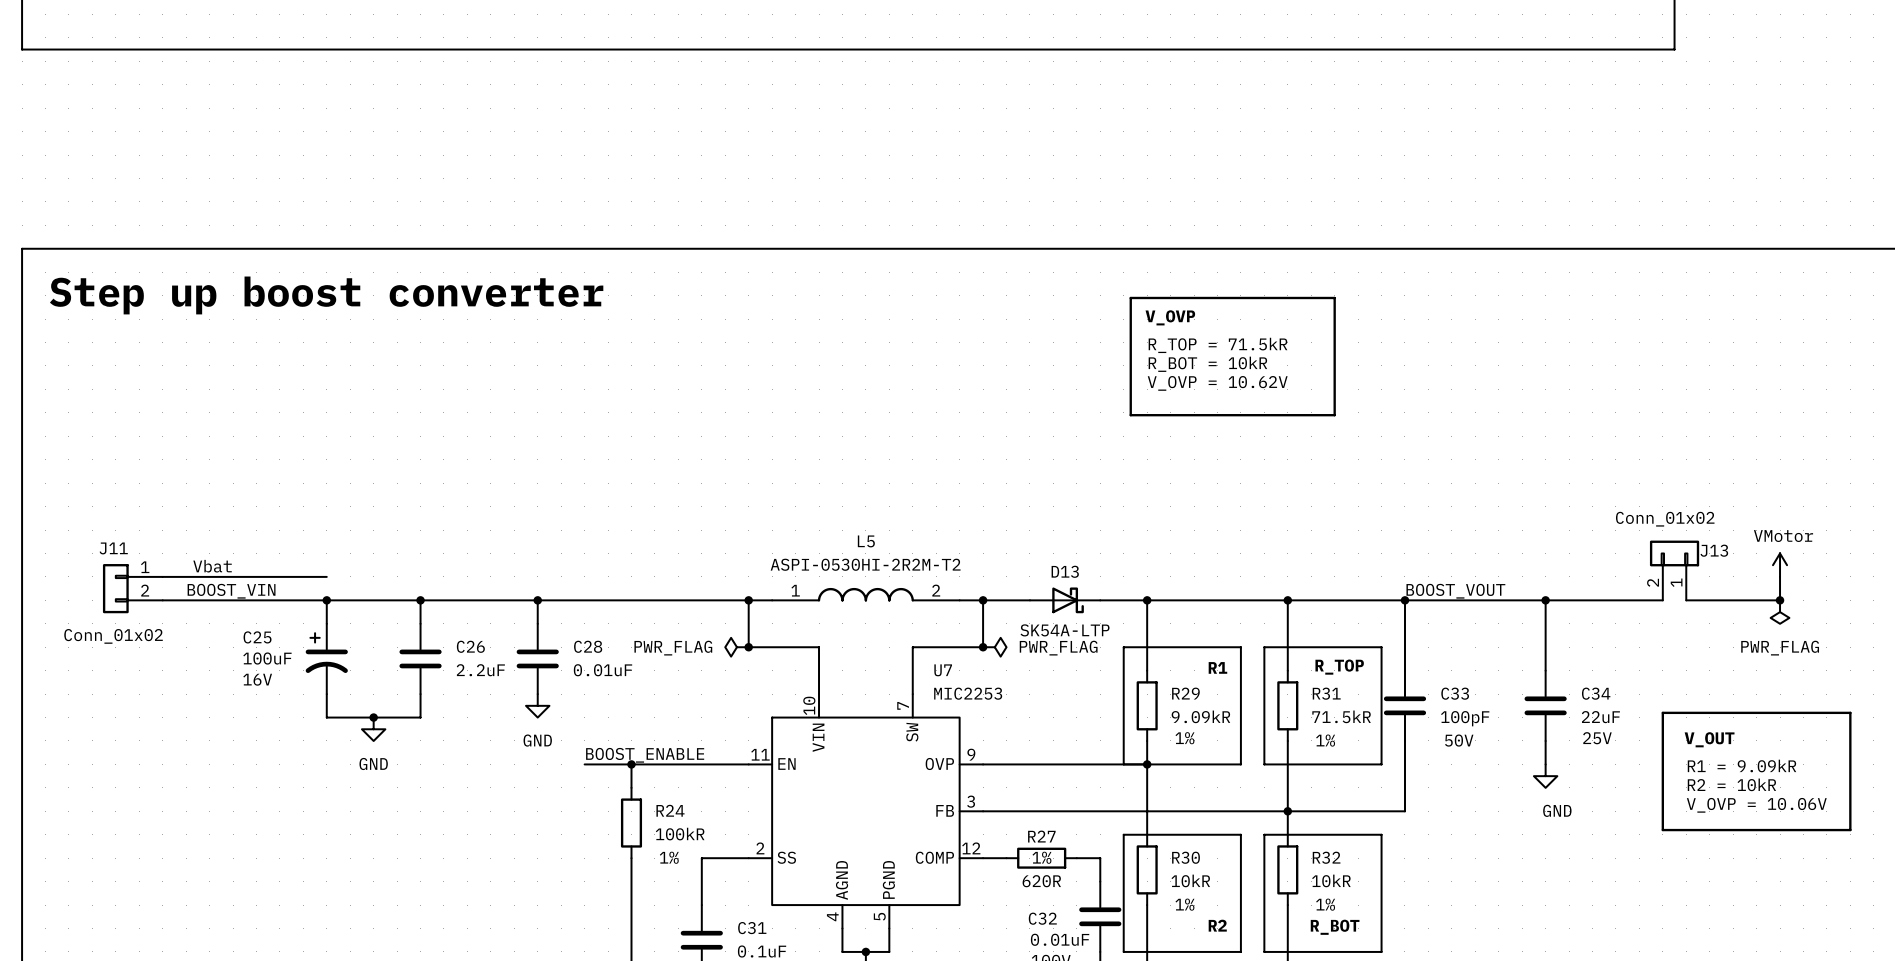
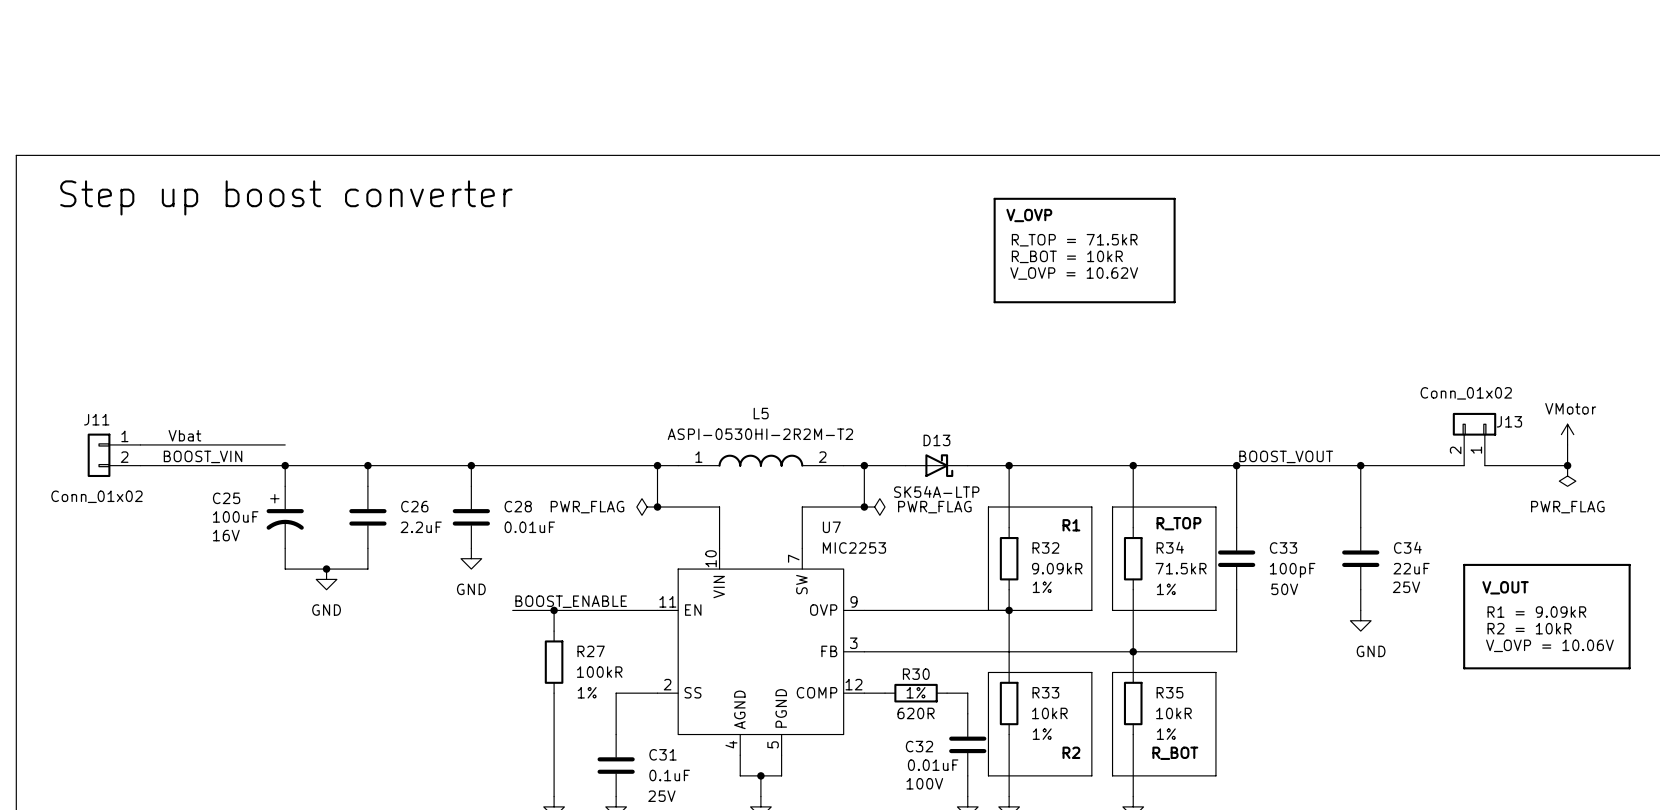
R29 name: R29 (1185, 693) -> R32 (1045, 547)
R31 name: R31 (1326, 693) -> R34 (1170, 547)
R24 name: R24 (670, 810) -> R27 (591, 651)
R27 name: R27 (1041, 836) -> R30 (916, 674)
R30 name: R30 (1186, 857) -> R33 (1045, 692)
R32 name: R32 (1326, 857) -> R35 (1169, 692)

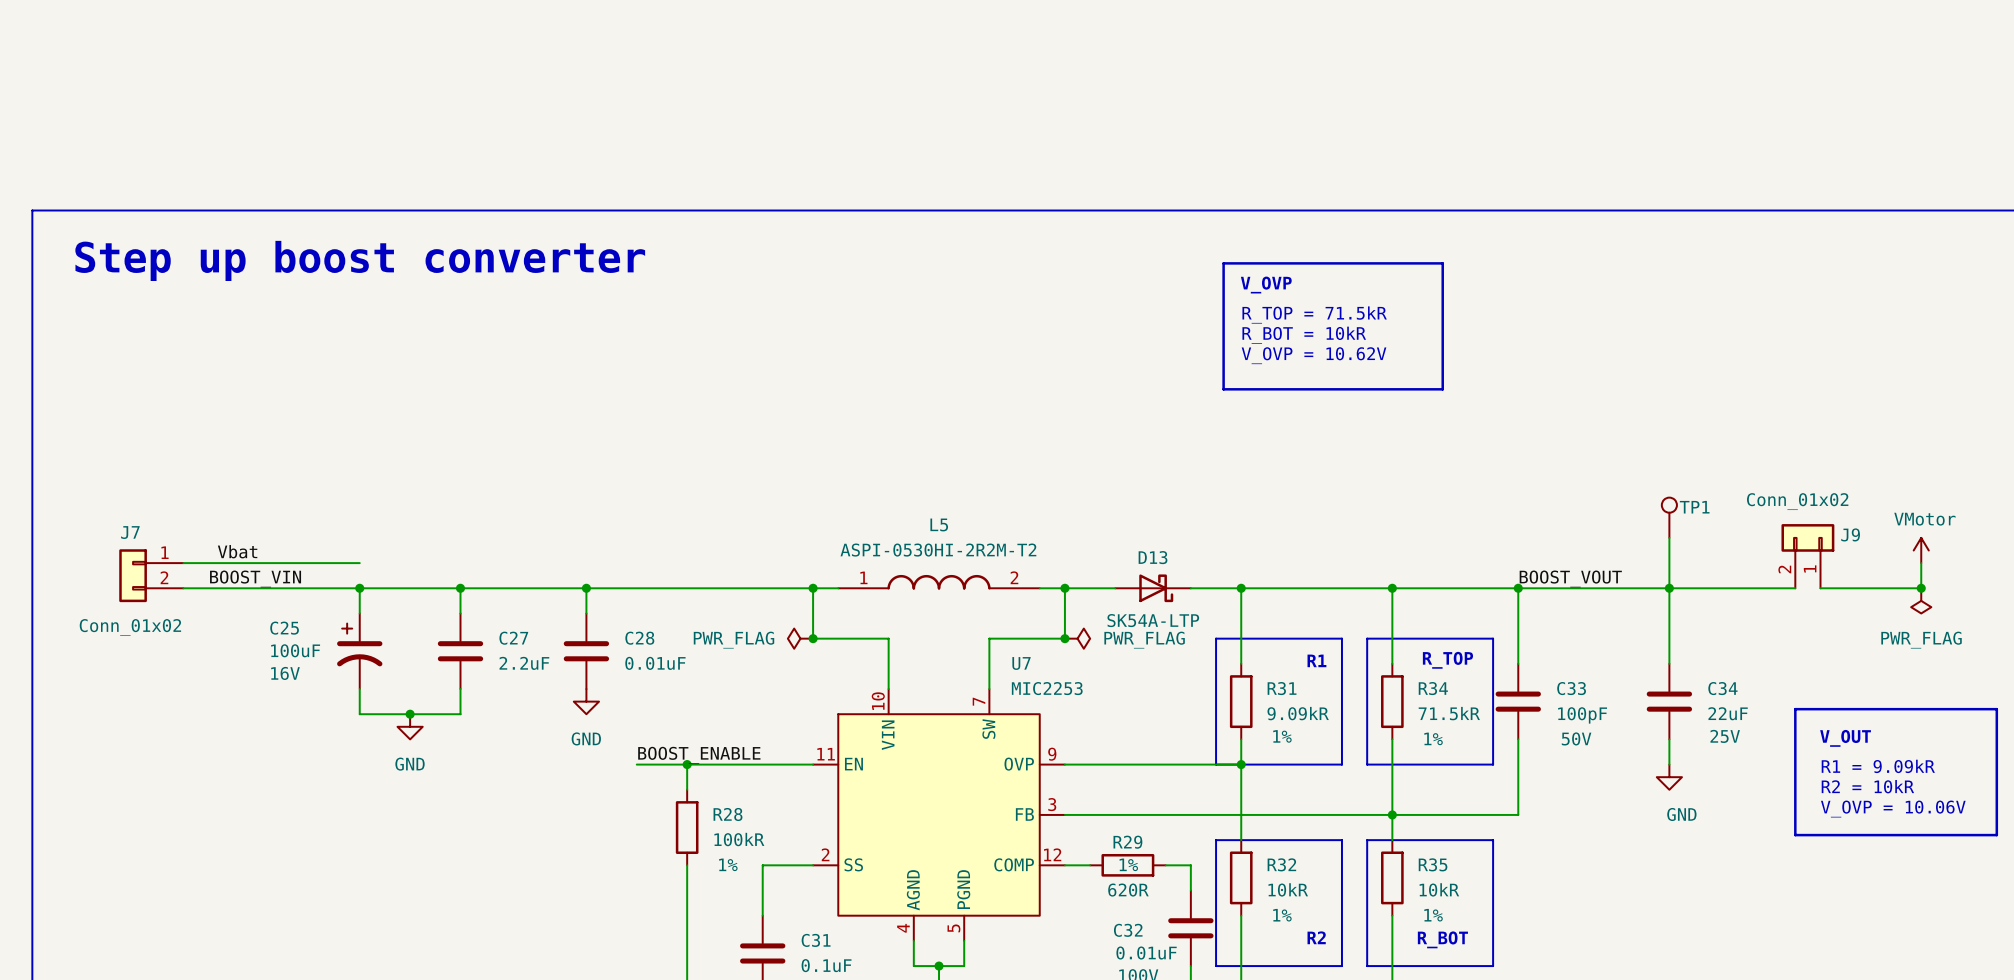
TP1: none -> (1669, 517)
J11 name: J11 (96, 419) -> J7 (130, 532)
J13 name: J13 (1509, 421) -> J9 (1850, 534)
wire: none -> (1669, 537) (1669, 588)
C26 name: C26 (414, 506) -> C27 (513, 638)
R32 name: R32 (1045, 547) -> R31 (1282, 688)
R27 name: R27 (591, 651) -> R28 (727, 814)
R30 name: R30 (916, 674) -> R29 (1127, 842)
R33 name: R33 (1045, 692) -> R32 (1281, 864)

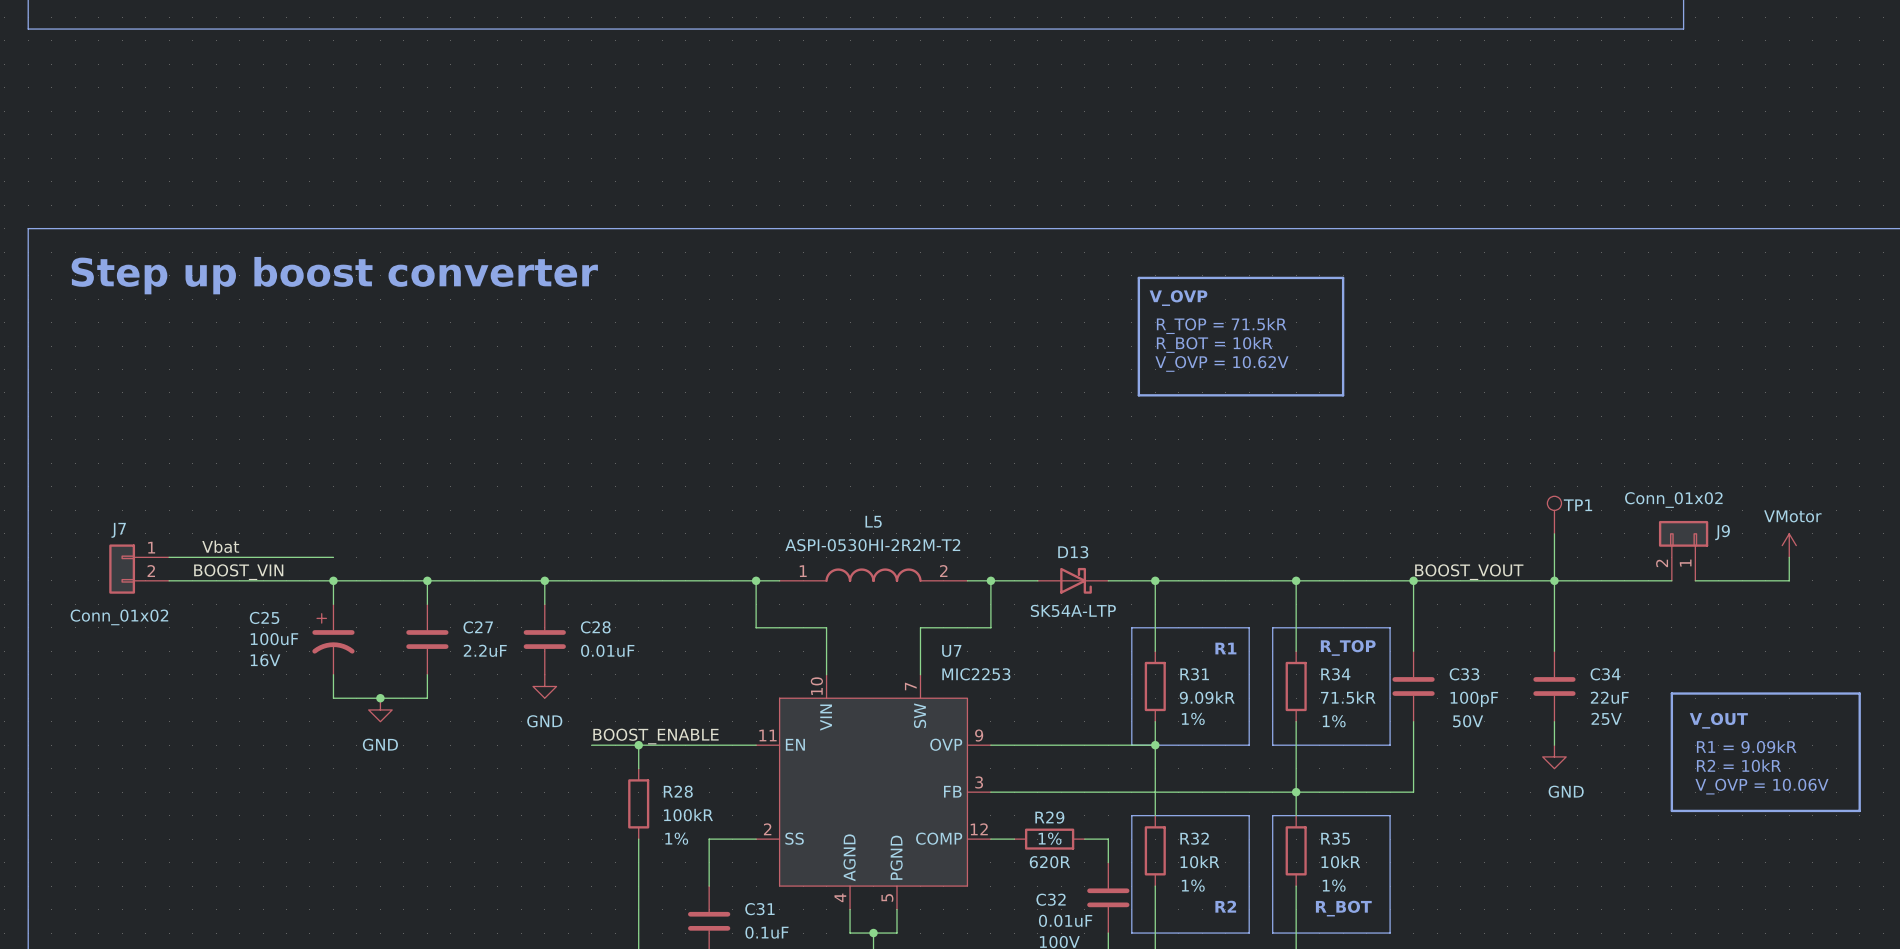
junction: (1921, 588) -> none
power symbol: PWR_FLAG (1921, 600) -> none
power symbol: PWR_FLAG (800, 638) -> none
junction: (813, 638) -> none
junction: (1064, 638) -> none
power symbol: PWR_FLAG (1077, 638) -> none

